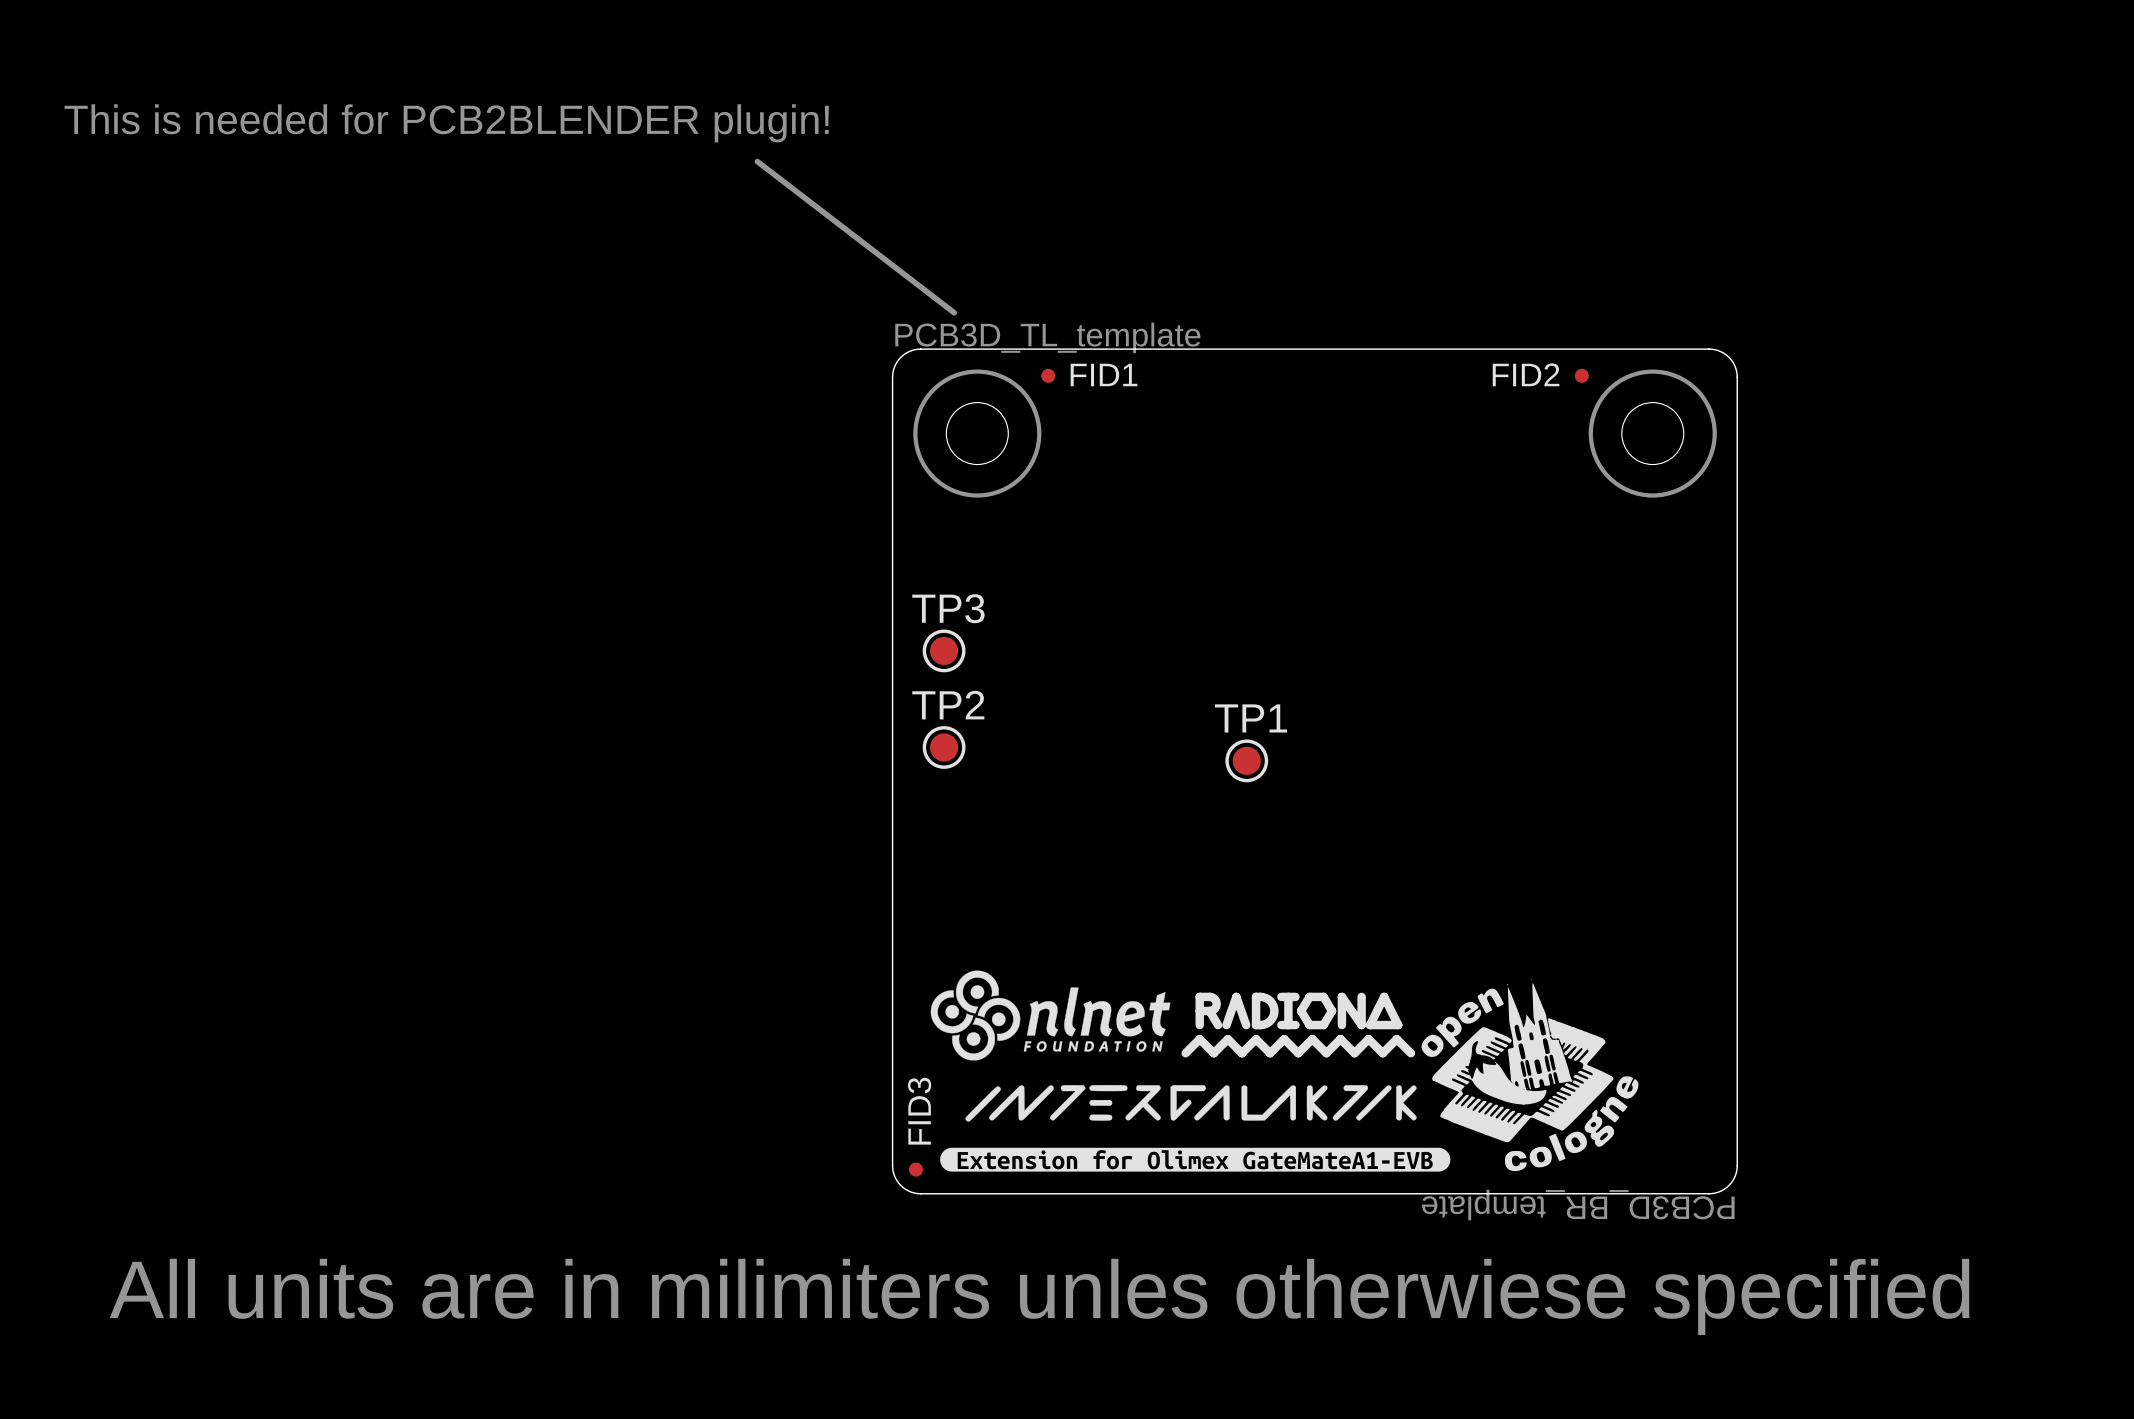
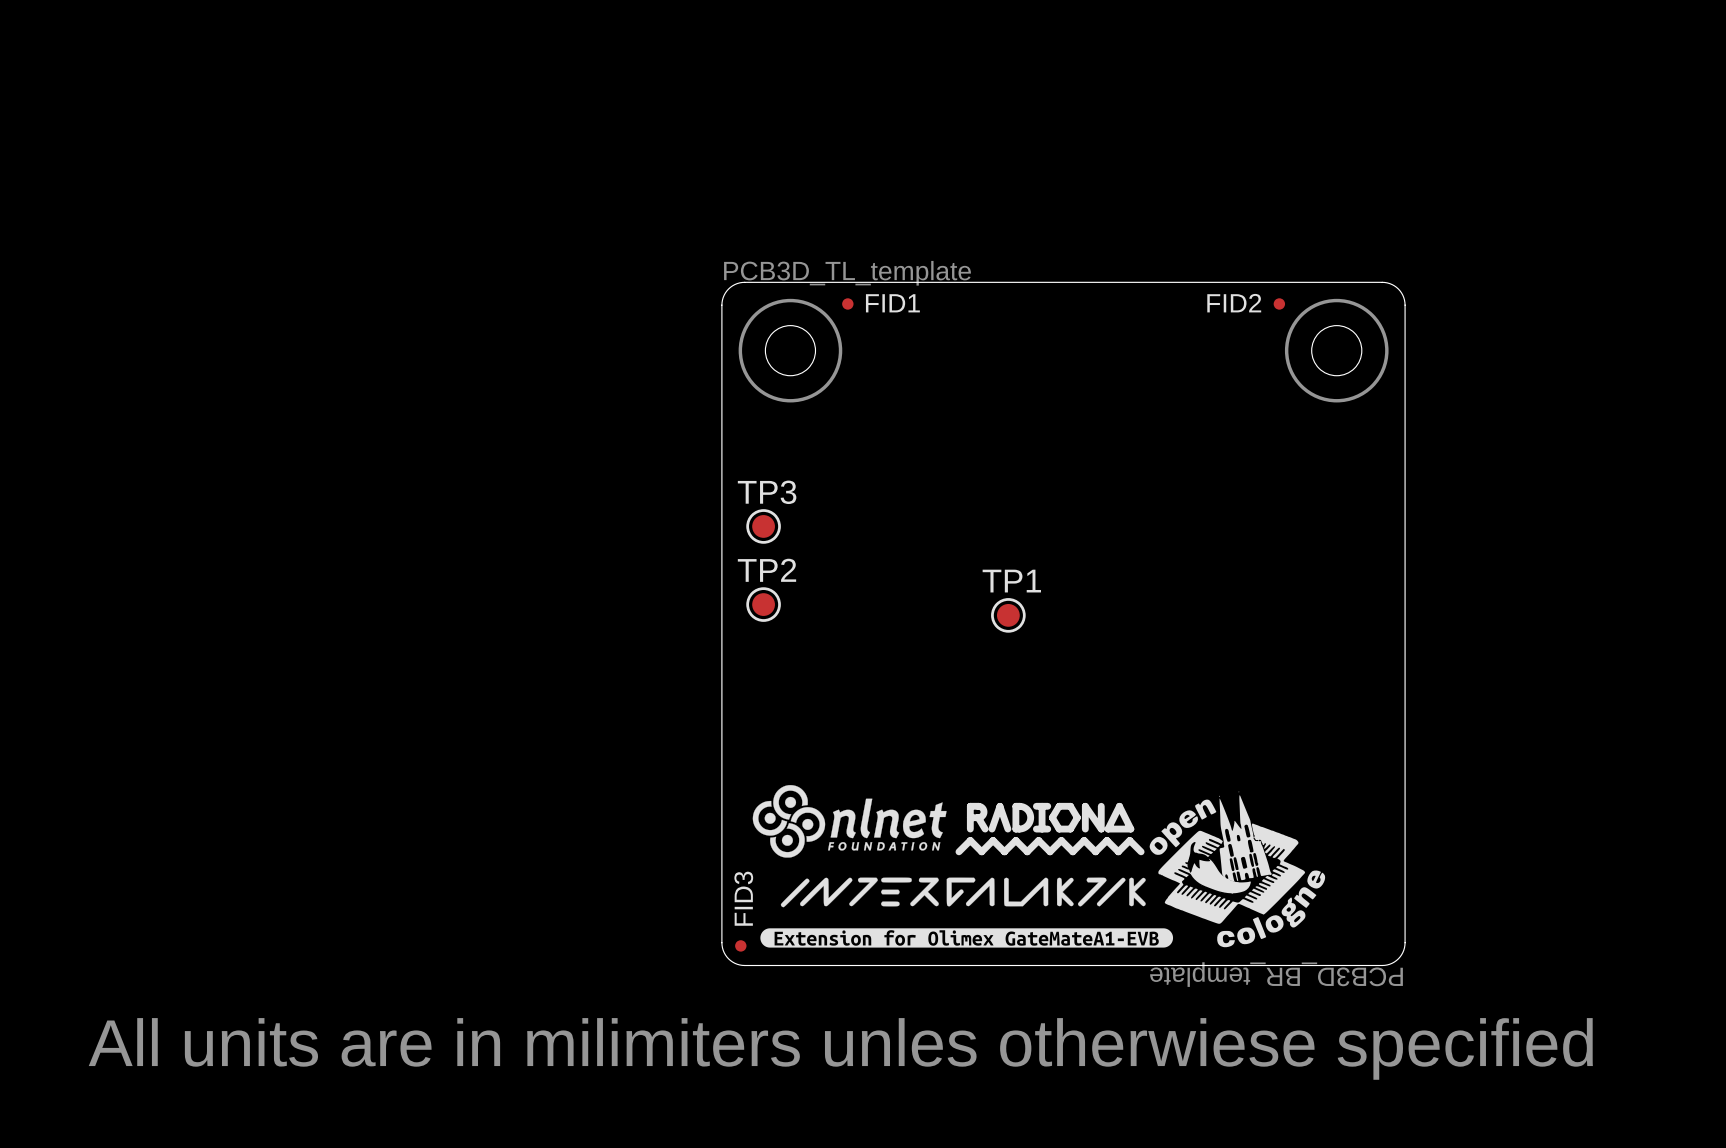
text: This is needed for PCB2BLENDER plugin! (446, 123) -> none
line: (757, 161) (954, 312) -> none

